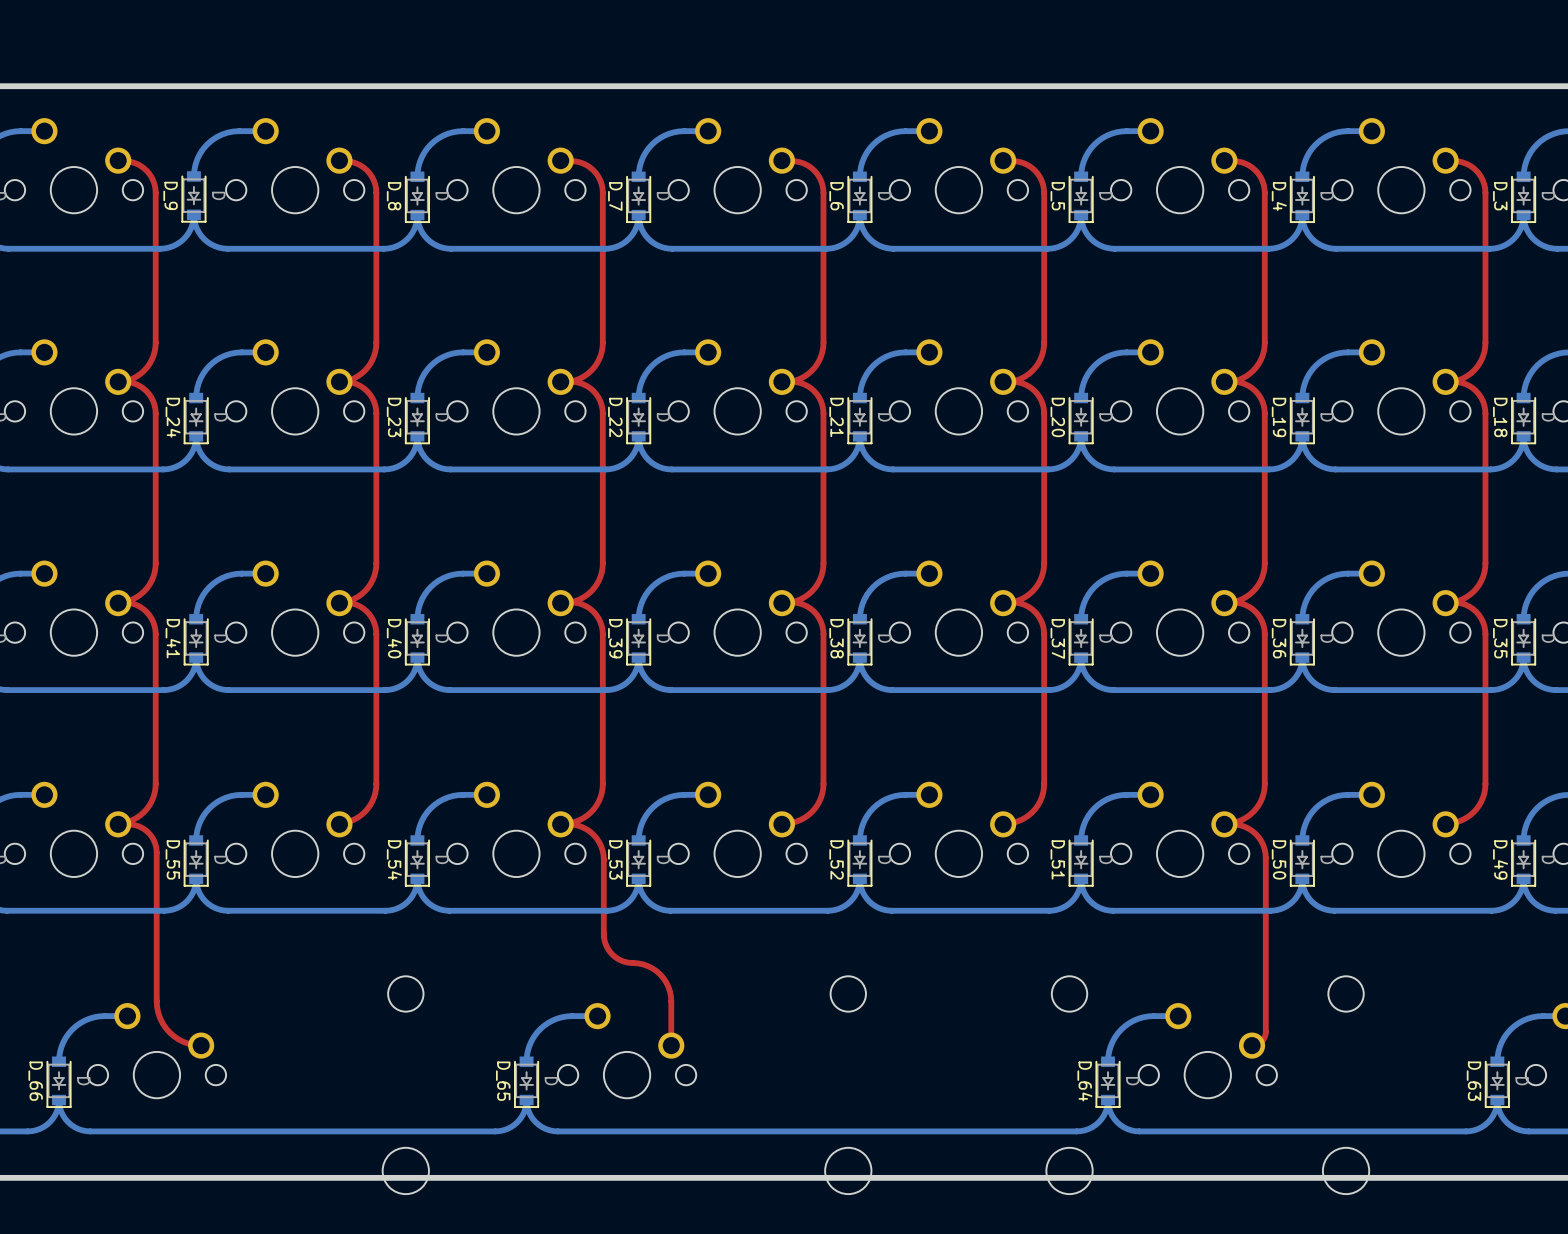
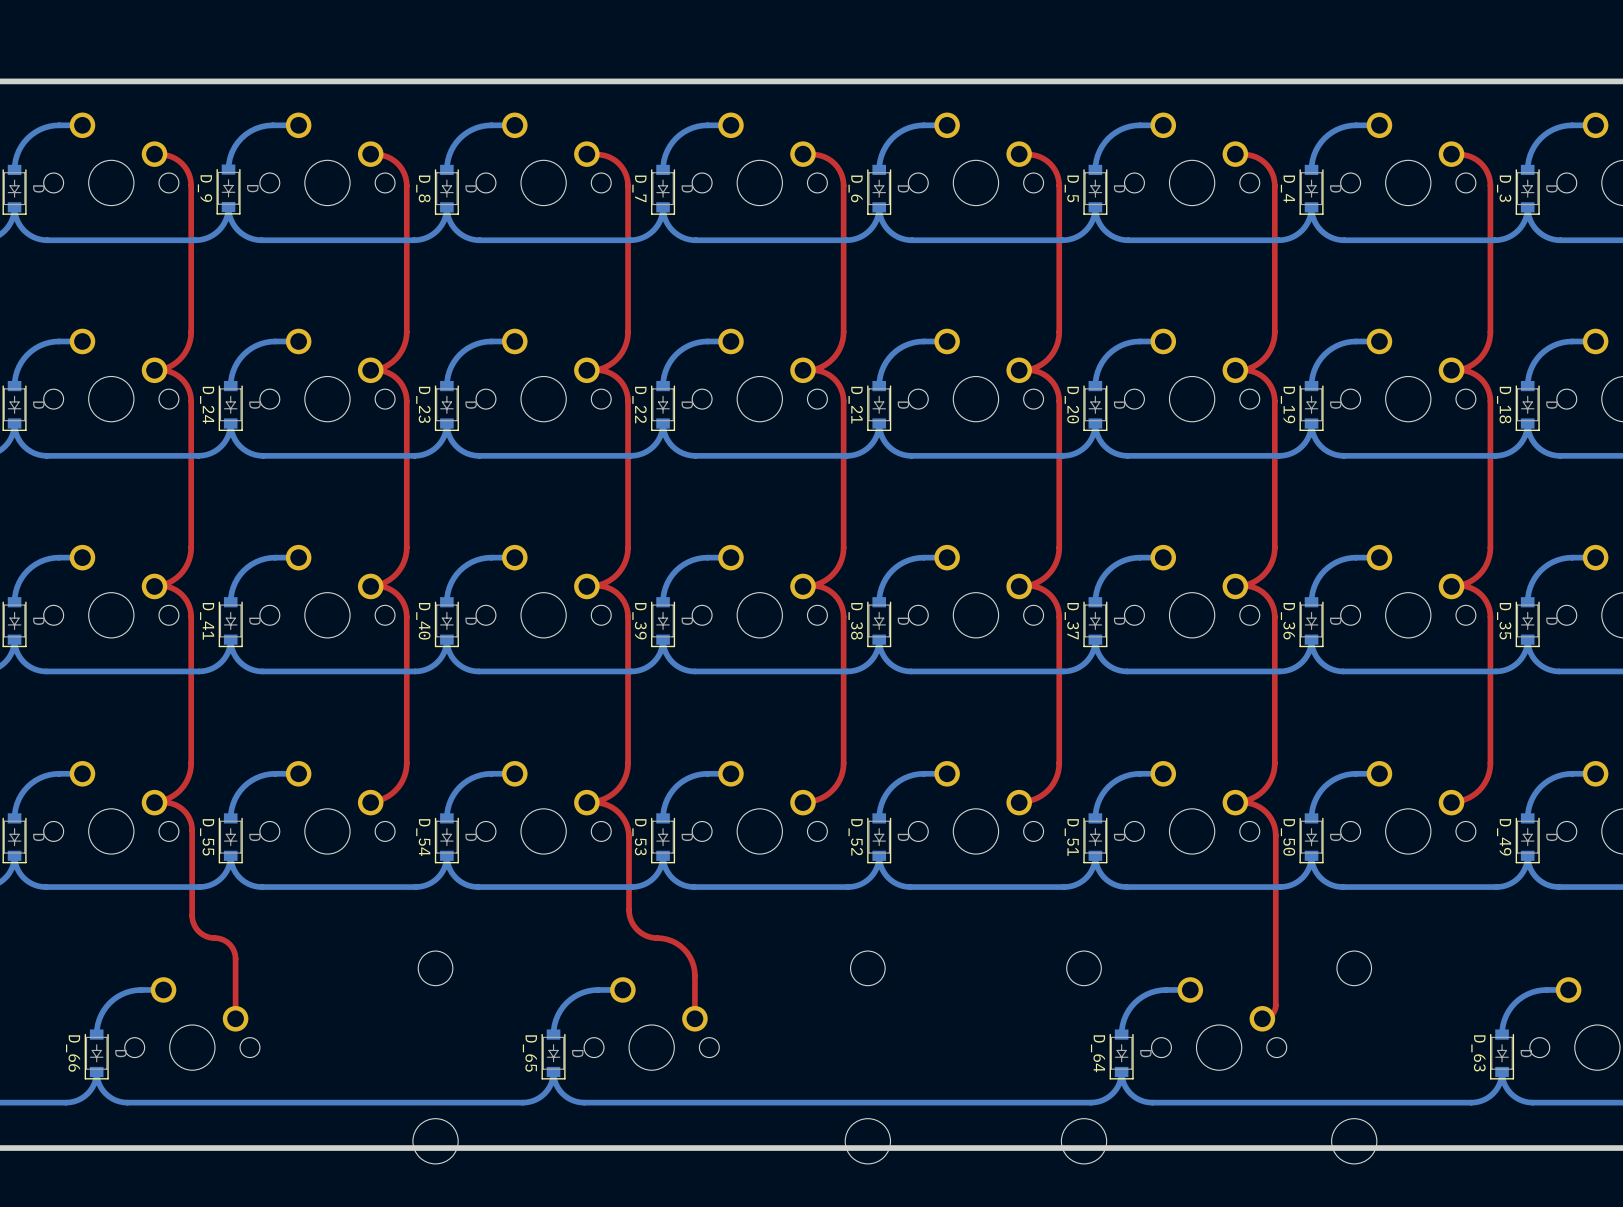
top track: (156, 939) (156, 1001) (160, 1018) (169, 1032) (178, 1039) (189, 1044) (201, 1045) -> (192, 915) (194, 925) (200, 933) (207, 936) (223, 940) (233, 949) (235, 958) (235, 1018)

